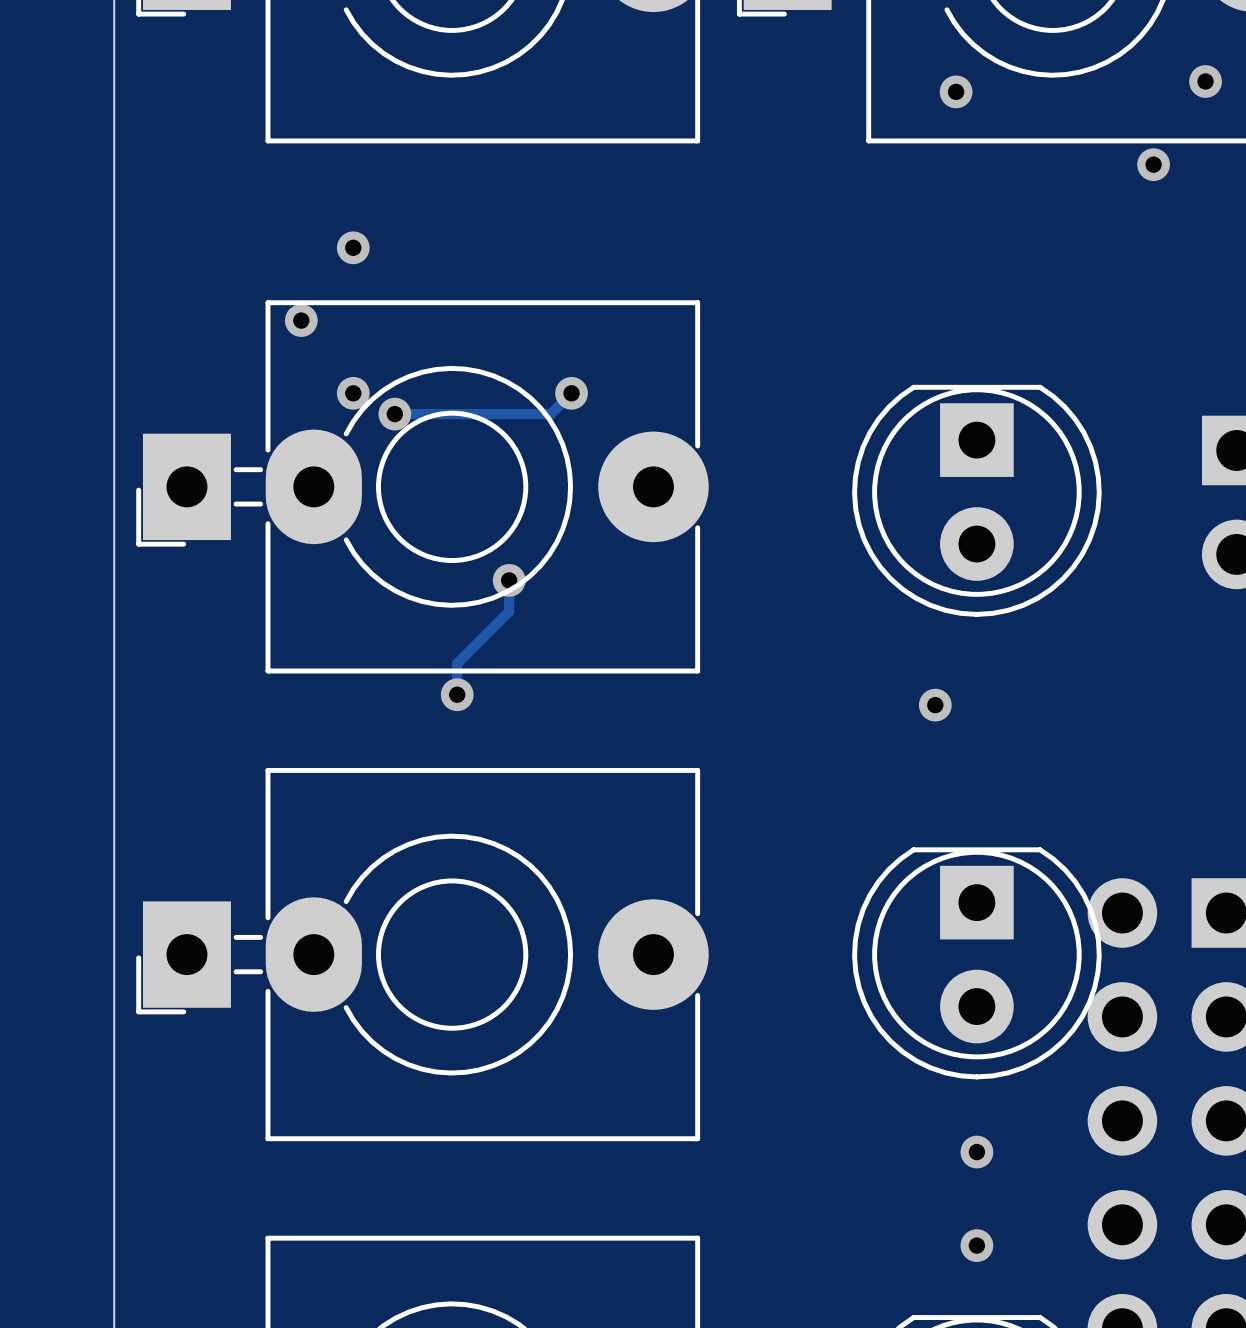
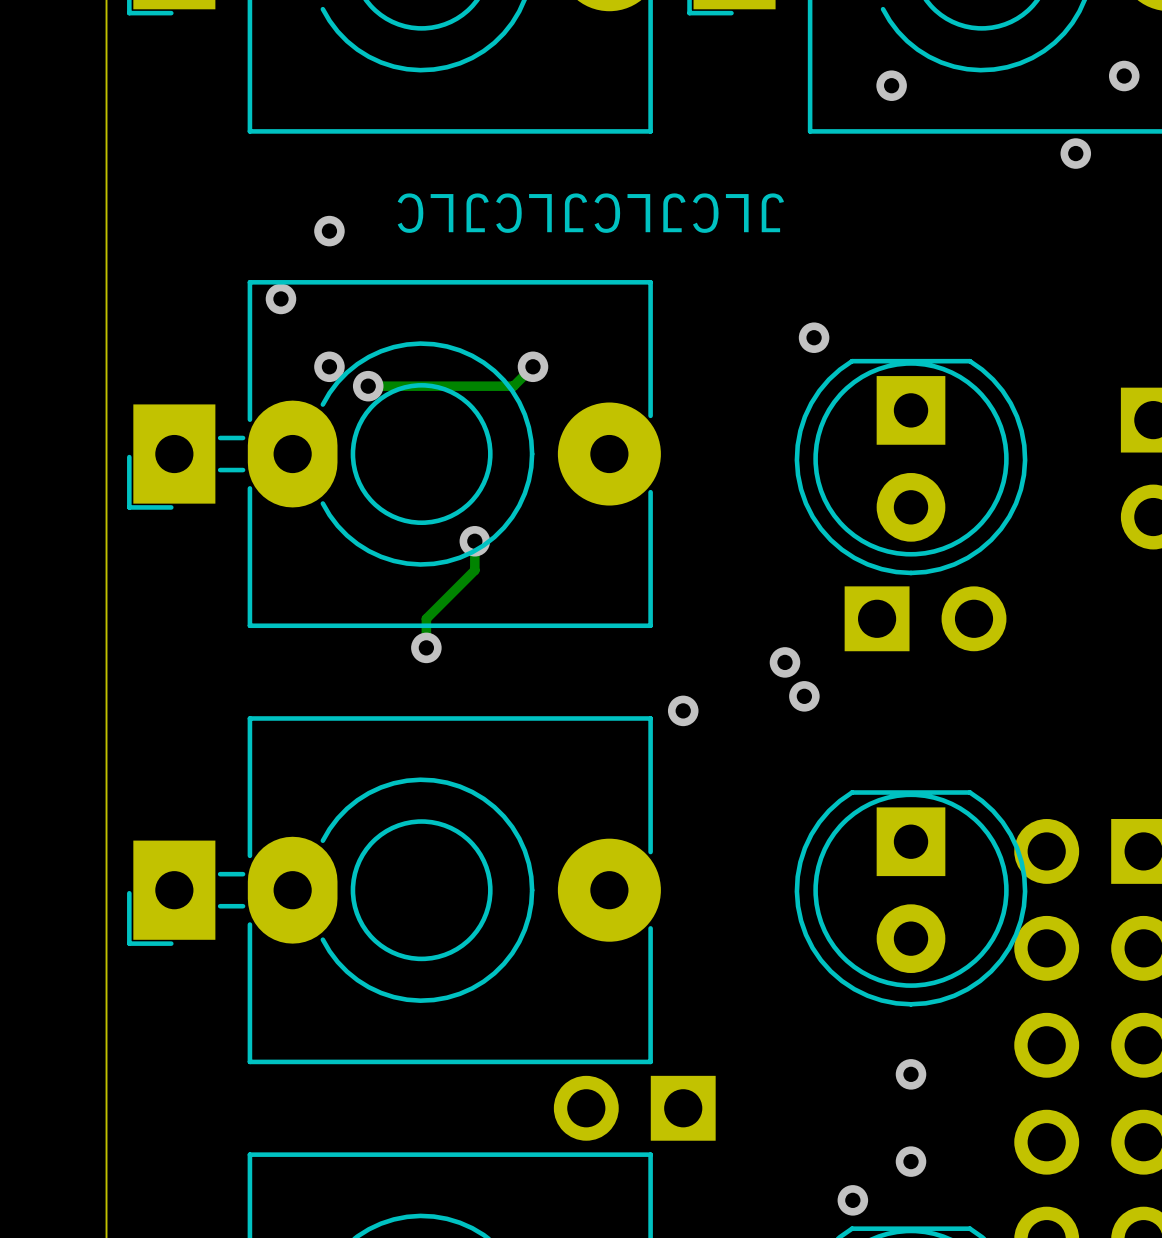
text: none -> JLCJLCJLCJLC (590, 213)
via: none -> (814, 337)
part: none -> (925, 618)
via: (935, 705) -> none
via: none -> (785, 662)
via: none -> (804, 696)
via: none -> (683, 710)
part: none -> (634, 1108)
via: none -> (852, 1200)

